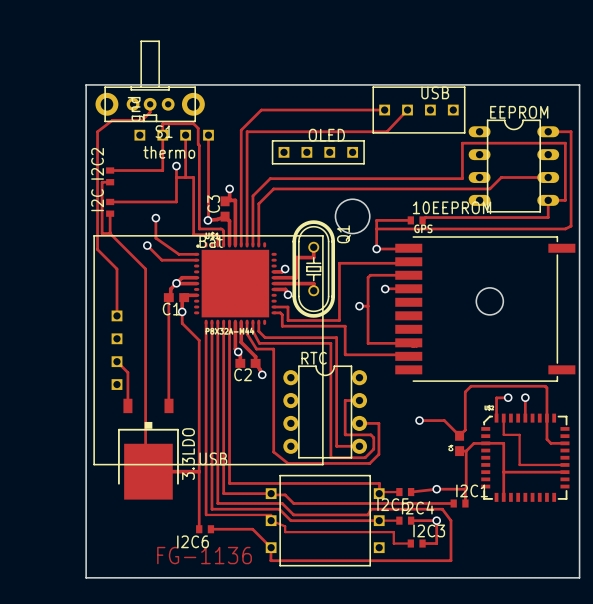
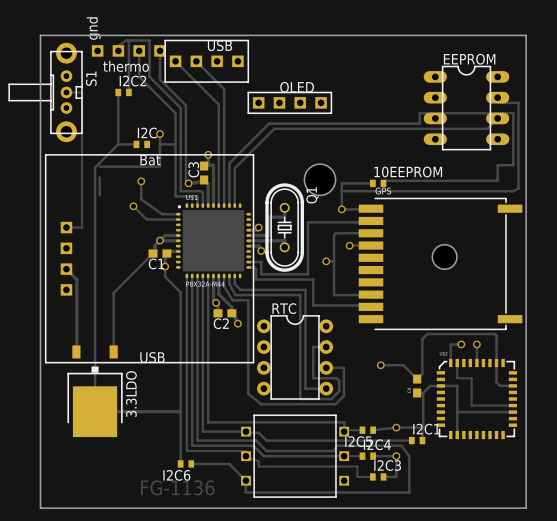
track: none -> (128, 40) (128, 92)
part: none -> (128, 50)
track: none -> (139, 50) (139, 76) (175, 113) (175, 144)
S1 rotation: 0° (150, 81) -> 90° counterclockwise (45, 92)
S1 position: (150, 81) -> (45, 92)
board edge: (579, 84) (86, 84) (86, 577) -> (526, 60) (526, 35) (40, 35) (40, 508) (77, 508)
part: none -> (206, 61)
track: (150, 104) (150, 112) (142, 120) (112, 120) (97, 131) (97, 249) (117, 269) (117, 315) -> none
track: (384, 110) (261, 110) (241, 130) (241, 133) -> (175, 61) (218, 104)
track: (407, 110) (386, 131) (247, 131) -> (196, 61) (224, 89) (224, 102)
part: (418, 110) -> none
track: none -> (66, 92) (82, 92) (82, 227) (66, 227)
track: none -> (118, 92) (118, 144)
part: none -> (289, 102)
part: (174, 135) -> none
track: (185, 135) (185, 177) -> none
track: (208, 135) (207, 220) -> (159, 50) (159, 79) (185, 105) (185, 180) (188, 183)
EEPROM: none -> (466, 108)
track: (199, 145) (198, 128) (193, 123) (162, 123) (162, 170) (110, 170) -> (180, 115) (180, 108) (149, 76) (149, 40) (126, 40) (118, 45) (118, 50)
part: (318, 152) -> none
track: (462, 154) (462, 178) (270, 178) (252, 195) (252, 198) -> (419, 123) (269, 123) (229, 163)
EEPROM: (513, 166) -> none
I2C2 rotation: 0° (110, 176) -> 90° clockwise (123, 92)
I2C2 position: (110, 176) -> (123, 92)
track: none -> (118, 144) (136, 144)
track: none -> (118, 144) (95, 167) (95, 411) (134, 411)
track: (548, 177) (501, 177) (489, 188) (273, 188) -> (497, 118) (487, 128) (274, 128) (248, 154)
track: (110, 182) (102, 182) (102, 233) (110, 233) (145, 269) (145, 463) (153, 471) -> none
I2C rotation: 0° (110, 207) -> 90° clockwise (141, 144)
I2C position: (110, 207) -> (141, 144)
track: (168, 297) (168, 405) -> (153, 253) (113, 292) (113, 351)
part: none -> (149, 258)
track: none -> (66, 269) (76, 279) (76, 351)
part: (208, 350) -> none
track: (117, 361) (127, 372) (127, 405) -> none
3.3LDO position: (148, 449) -> (95, 391)

